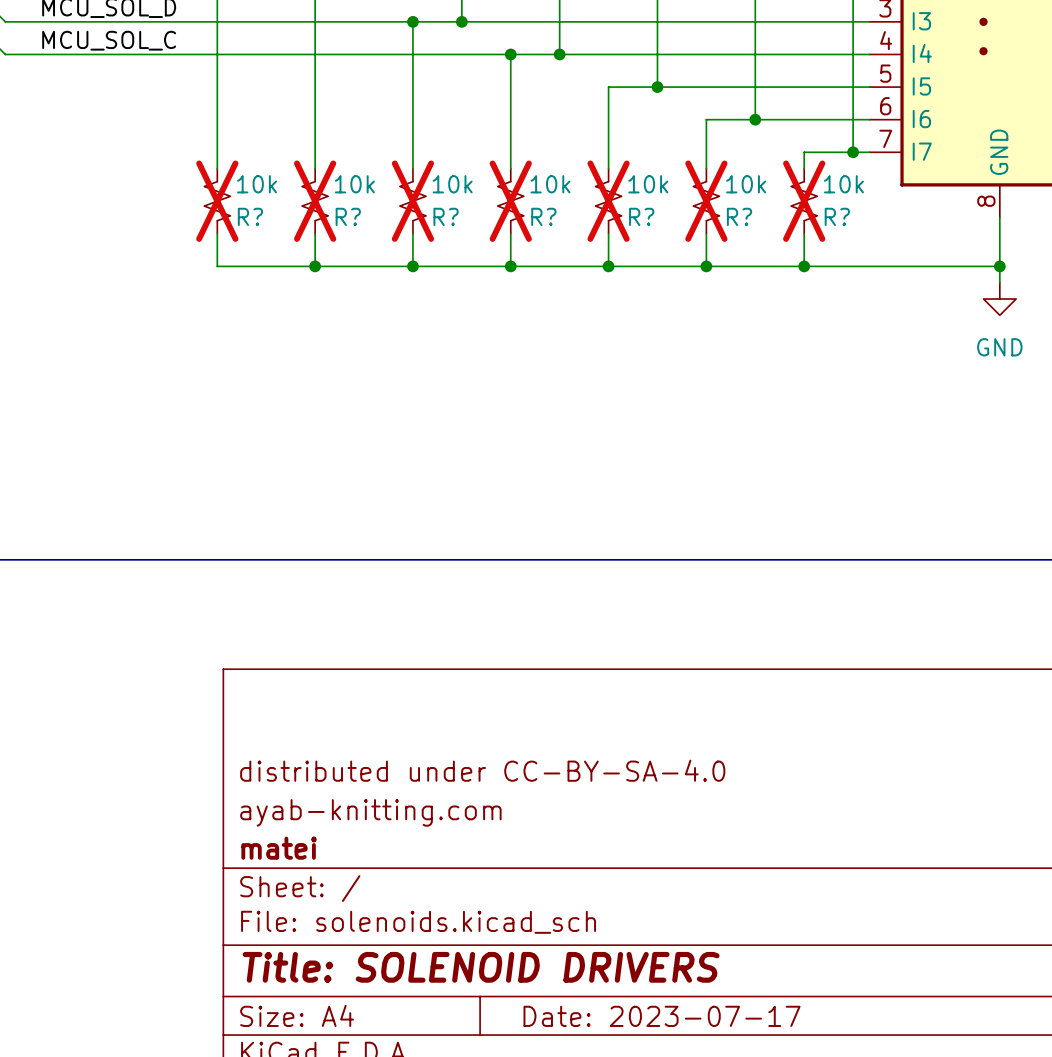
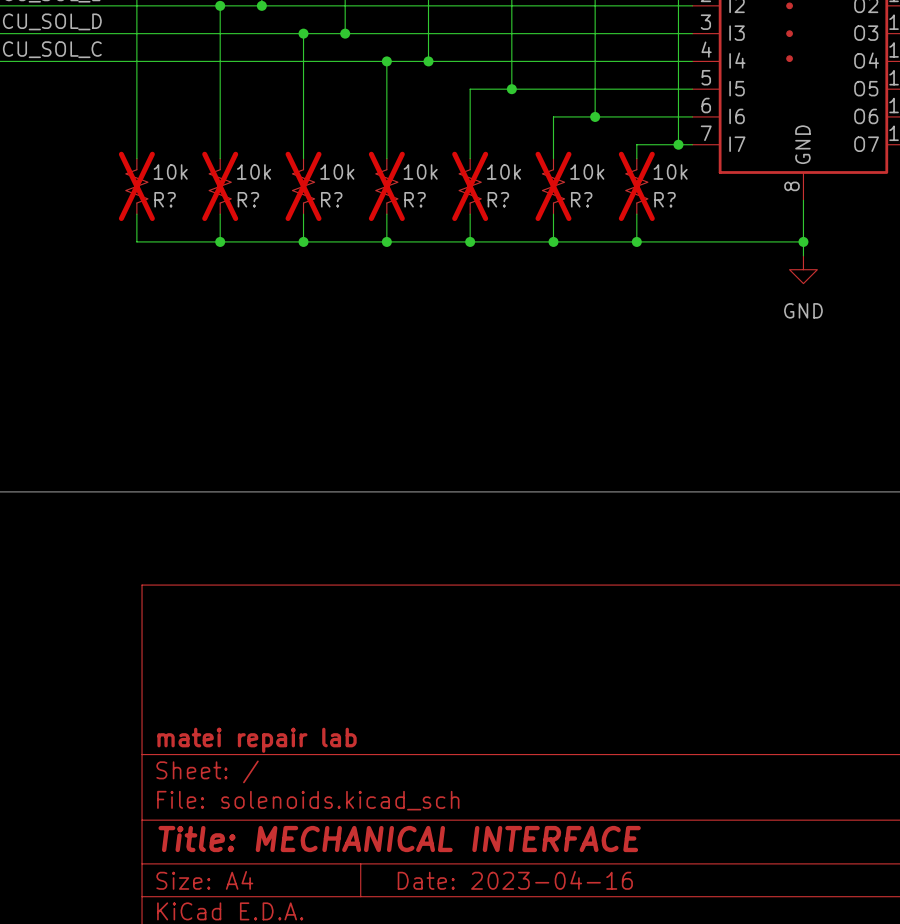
title block: distributed under CC-BY-SA-4.0 (482, 770) -> none
title block: ayab-knitting.com (370, 812) -> none
title block: matei (279, 848) -> matei repair lab (257, 740)
title block: Title: SOLENOID DRIVERS (481, 967) -> Title: MECHANICAL INTERFACE (399, 839)
title block: Date: 2023-07-17 (662, 1016) -> Date: 2023-04-16 (515, 880)

